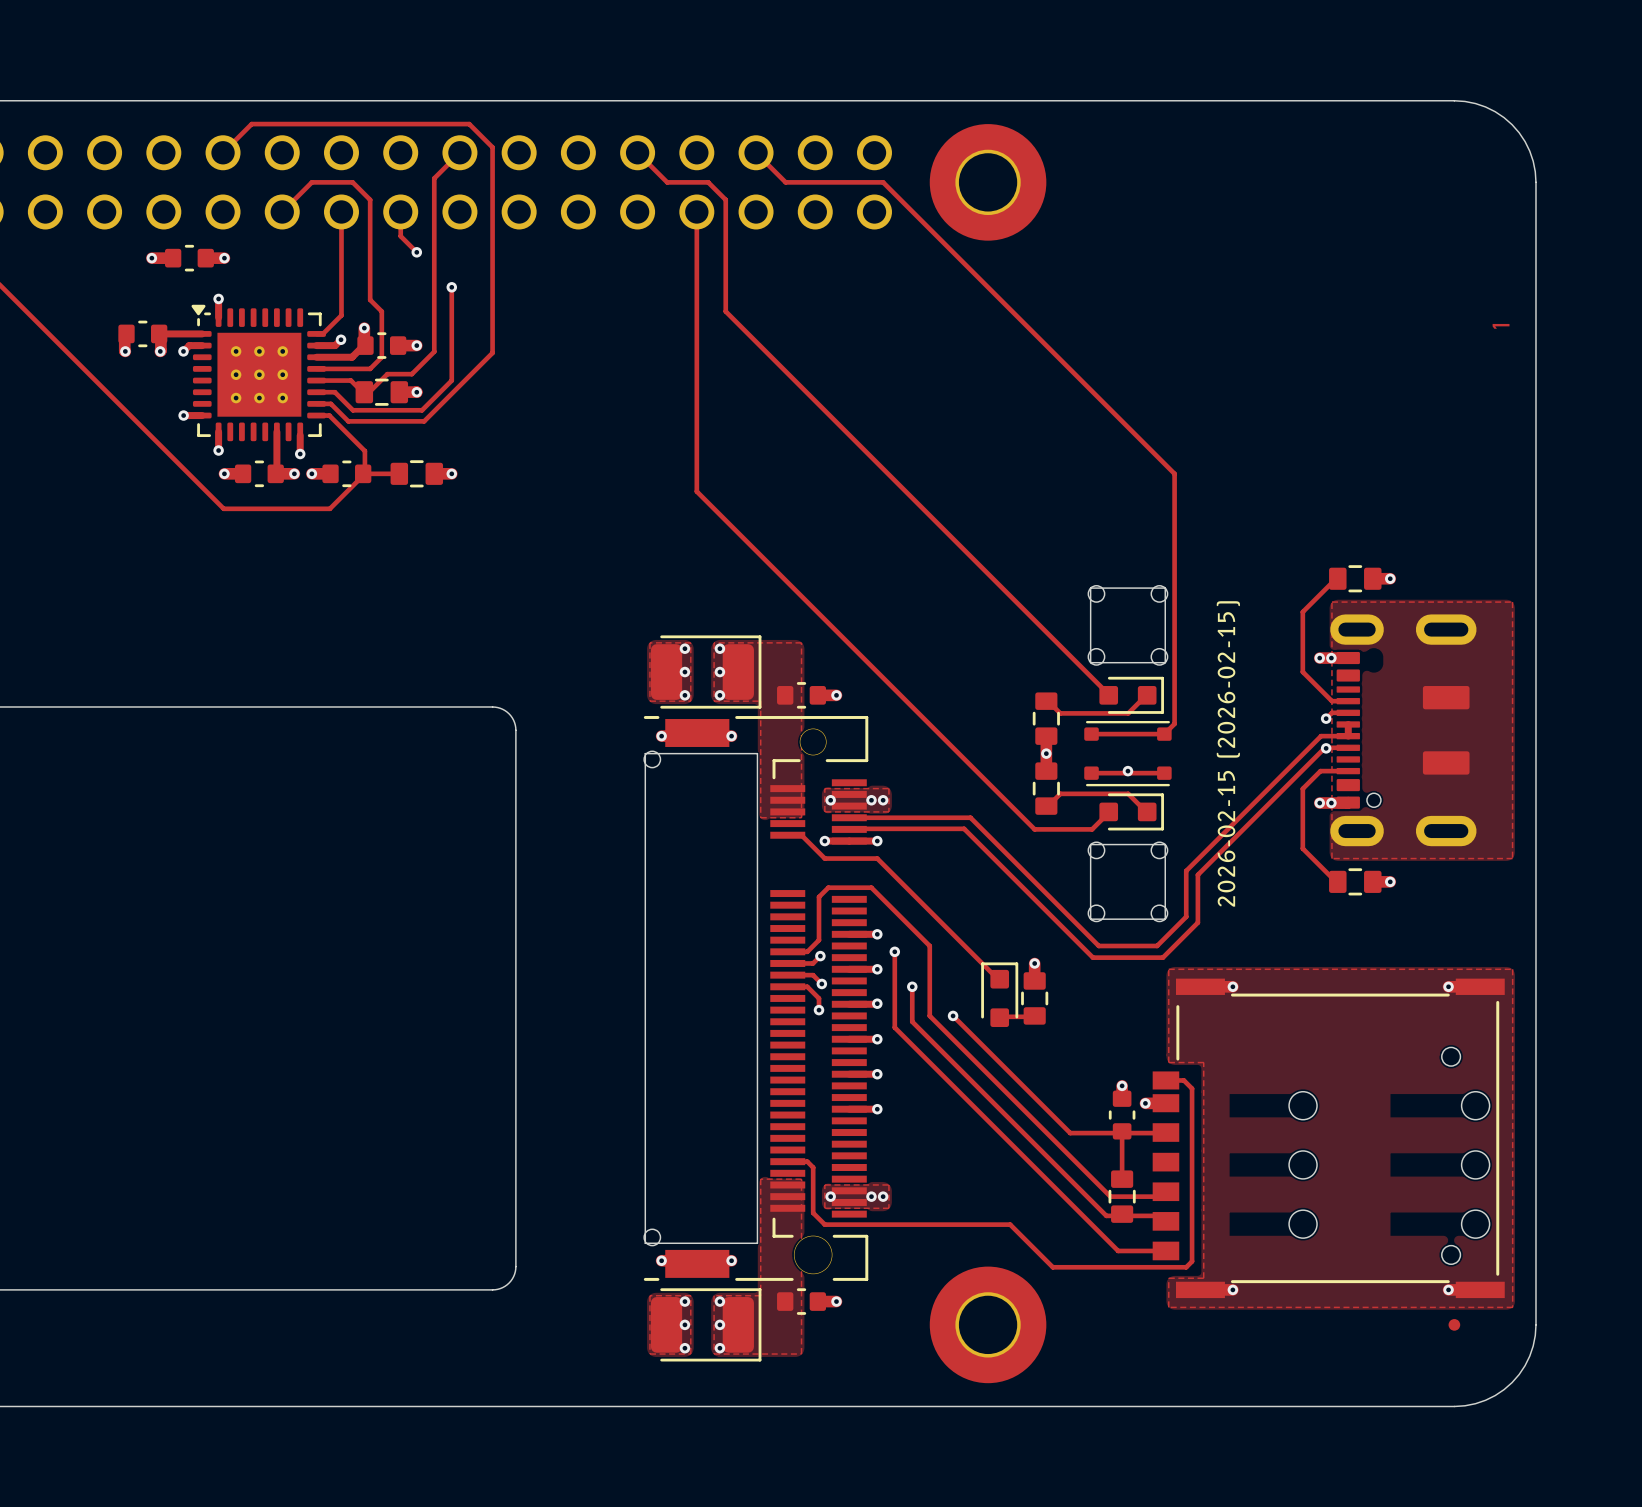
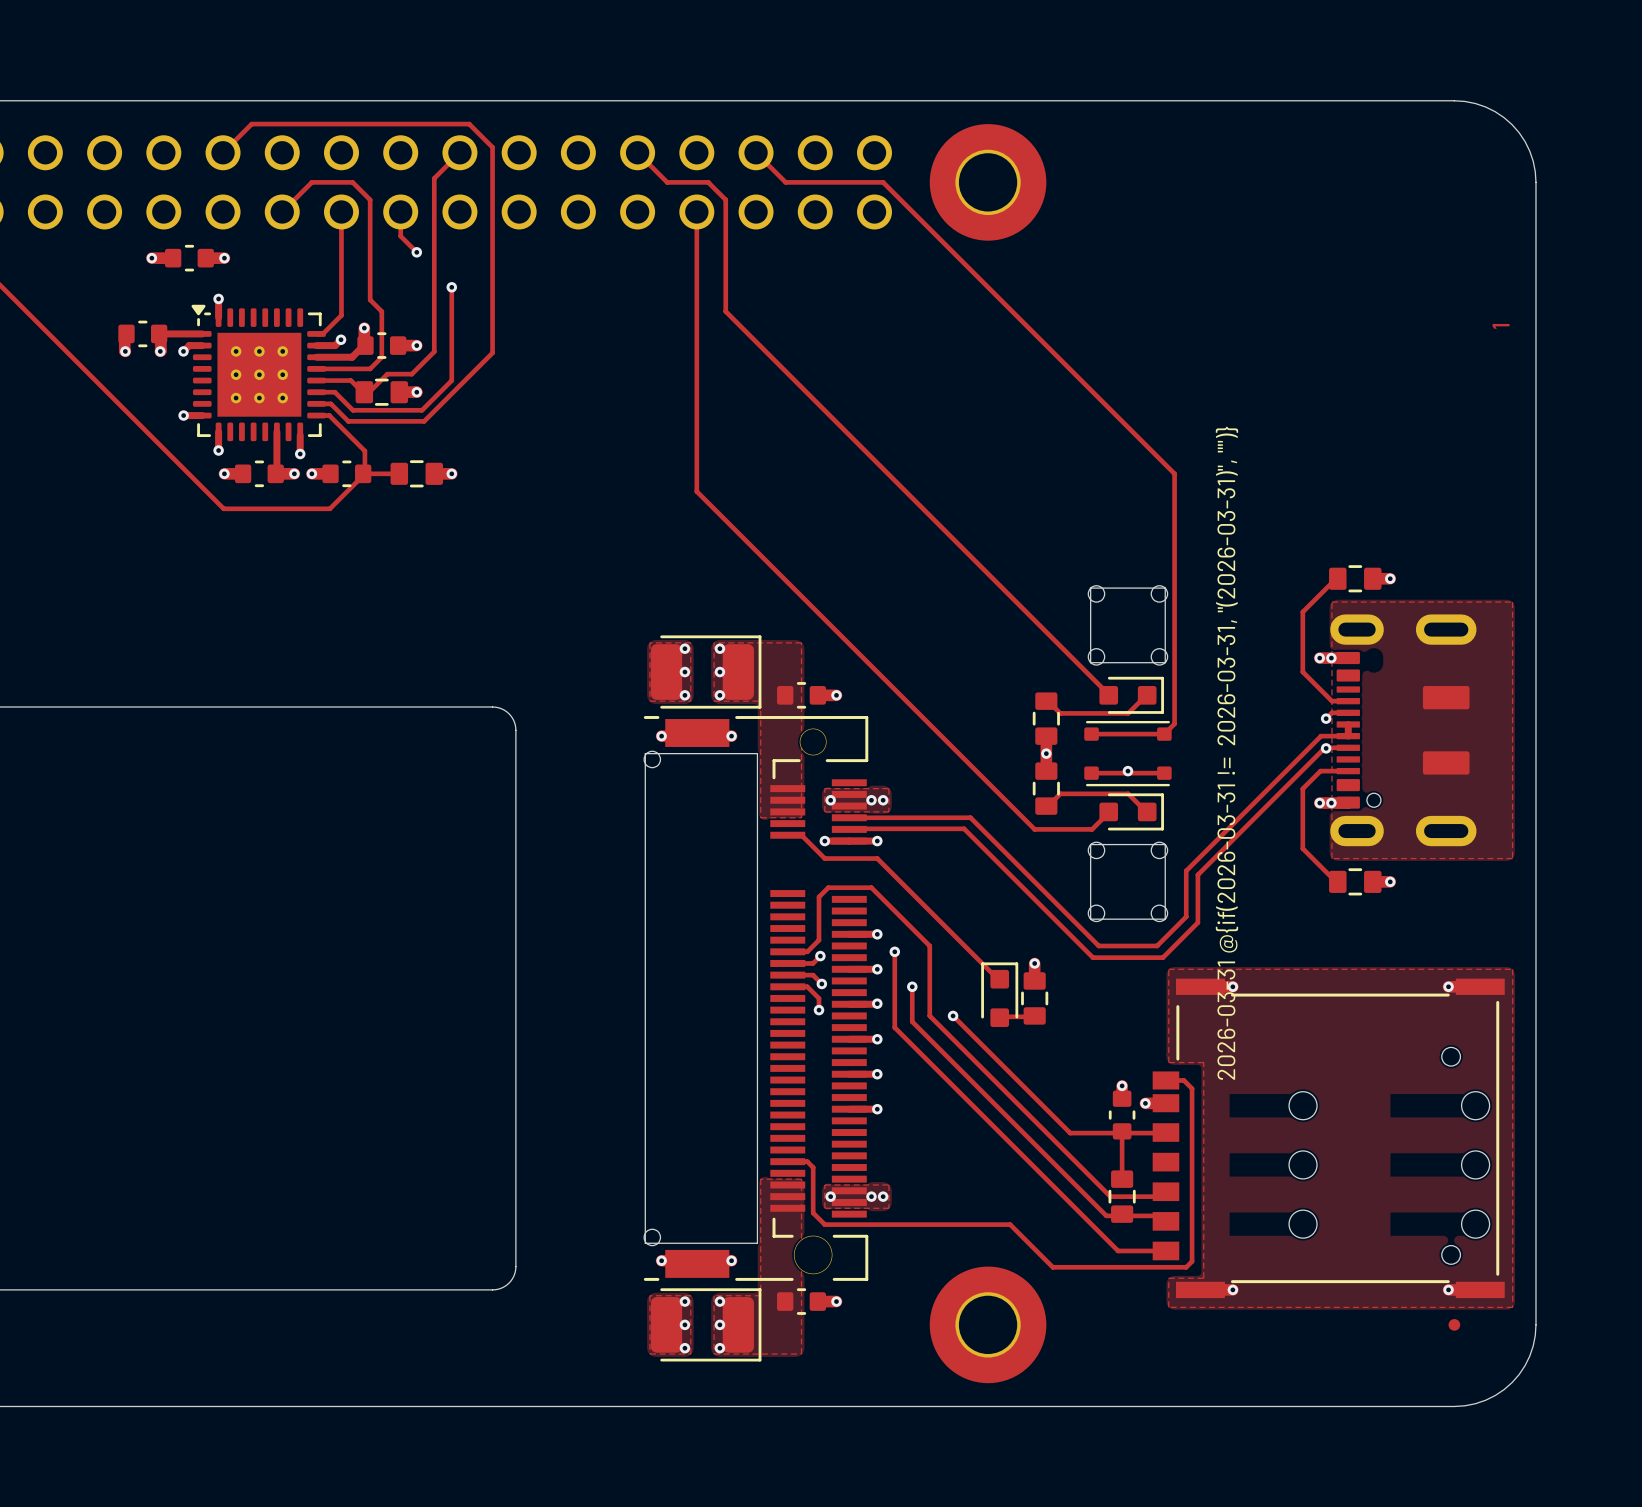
drawing shape: [1216, 601, 1240, 907] -> [1215, 426, 1239, 1080]

